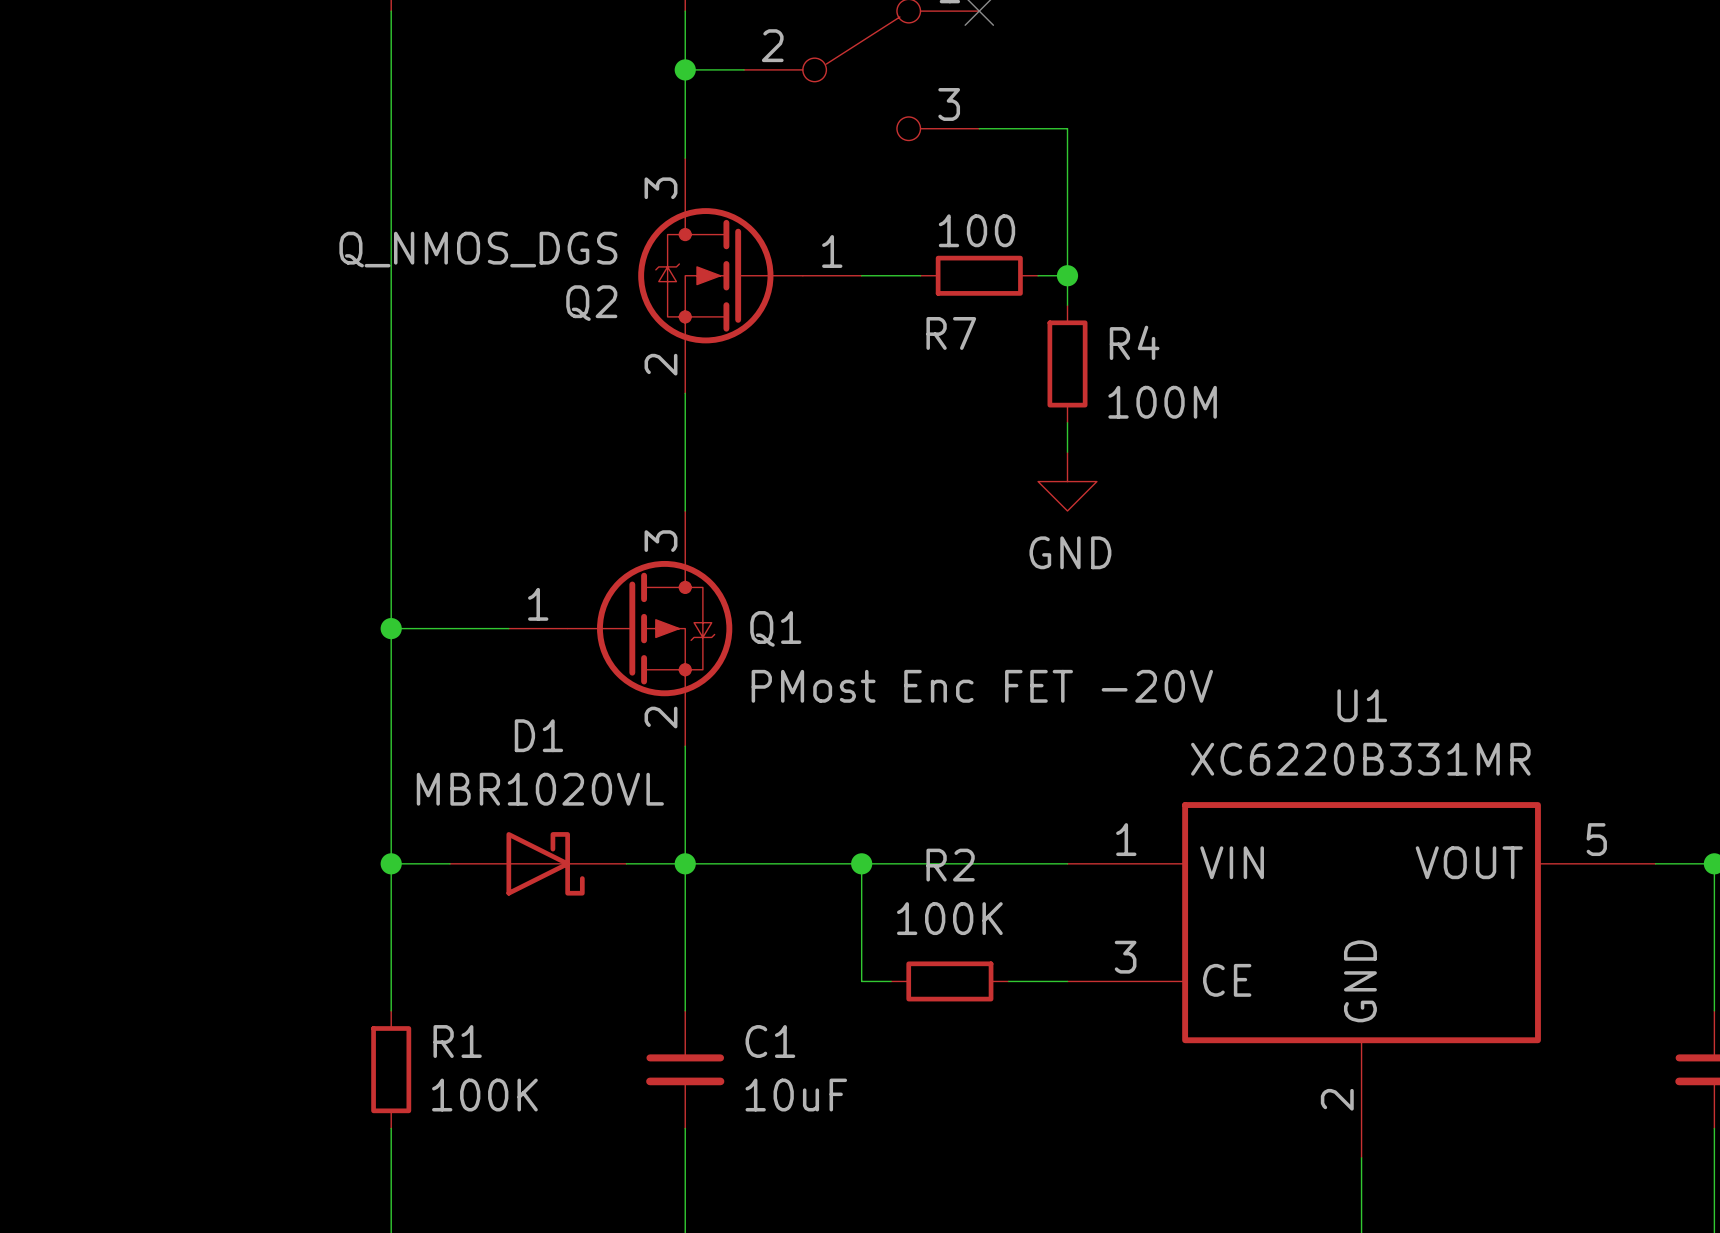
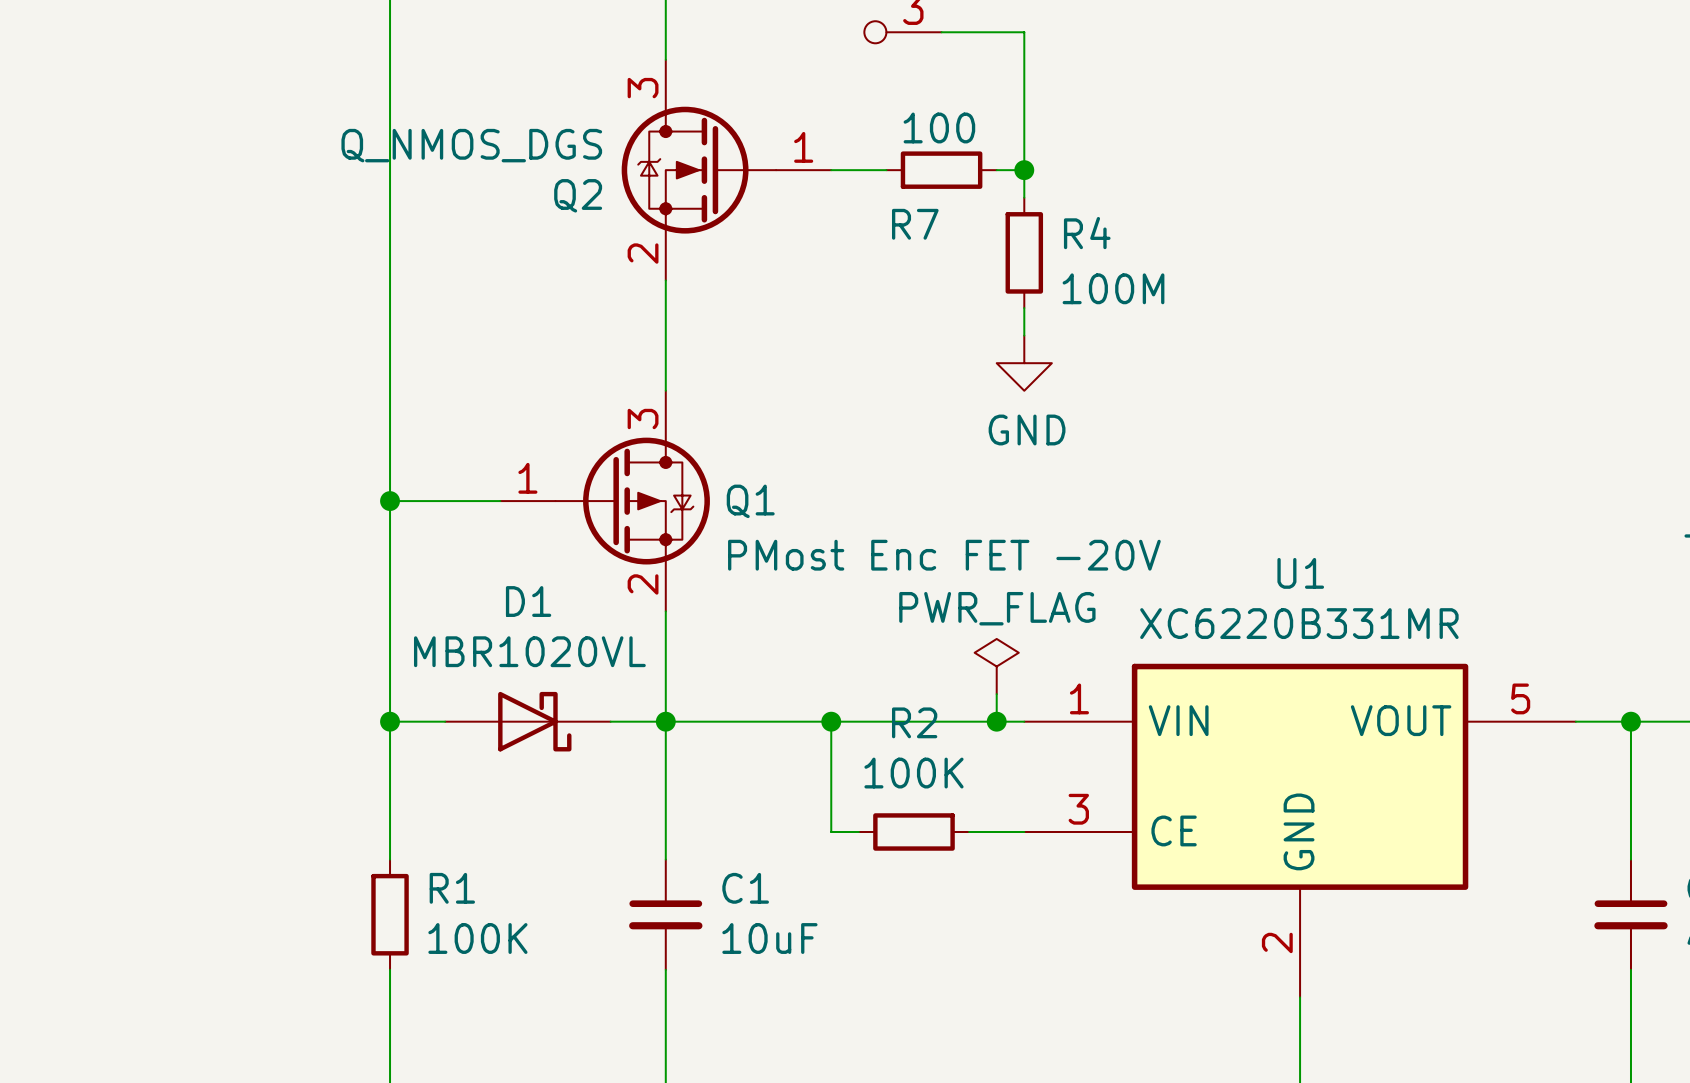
power symbol: none -> PWR_FLAG (996, 666)
wire: none -> (996, 694) (996, 721)
junction: none -> (996, 721)

